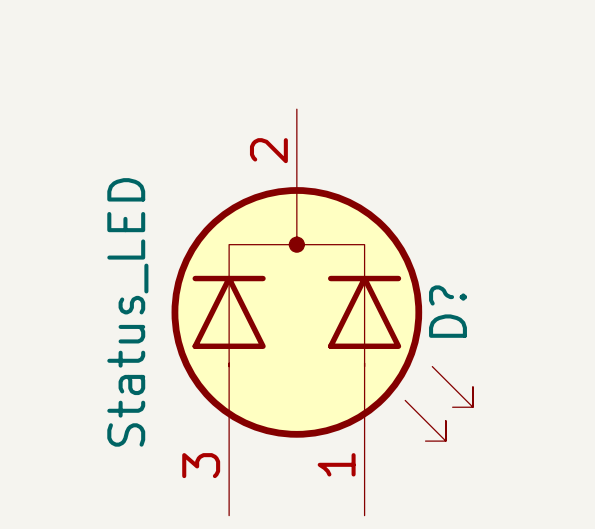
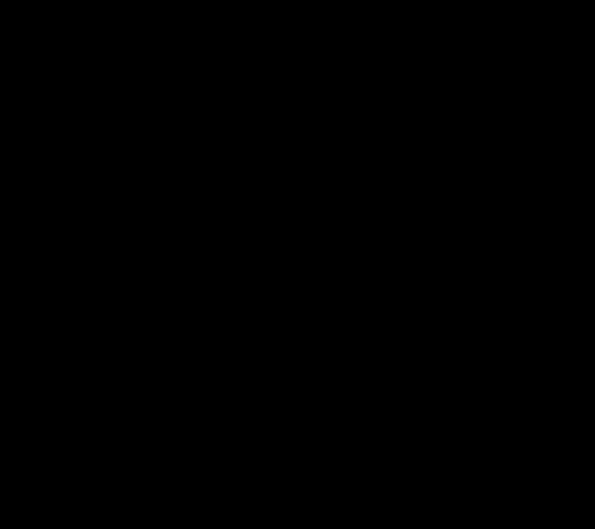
D?: Status_LED (322, 312) -> none

